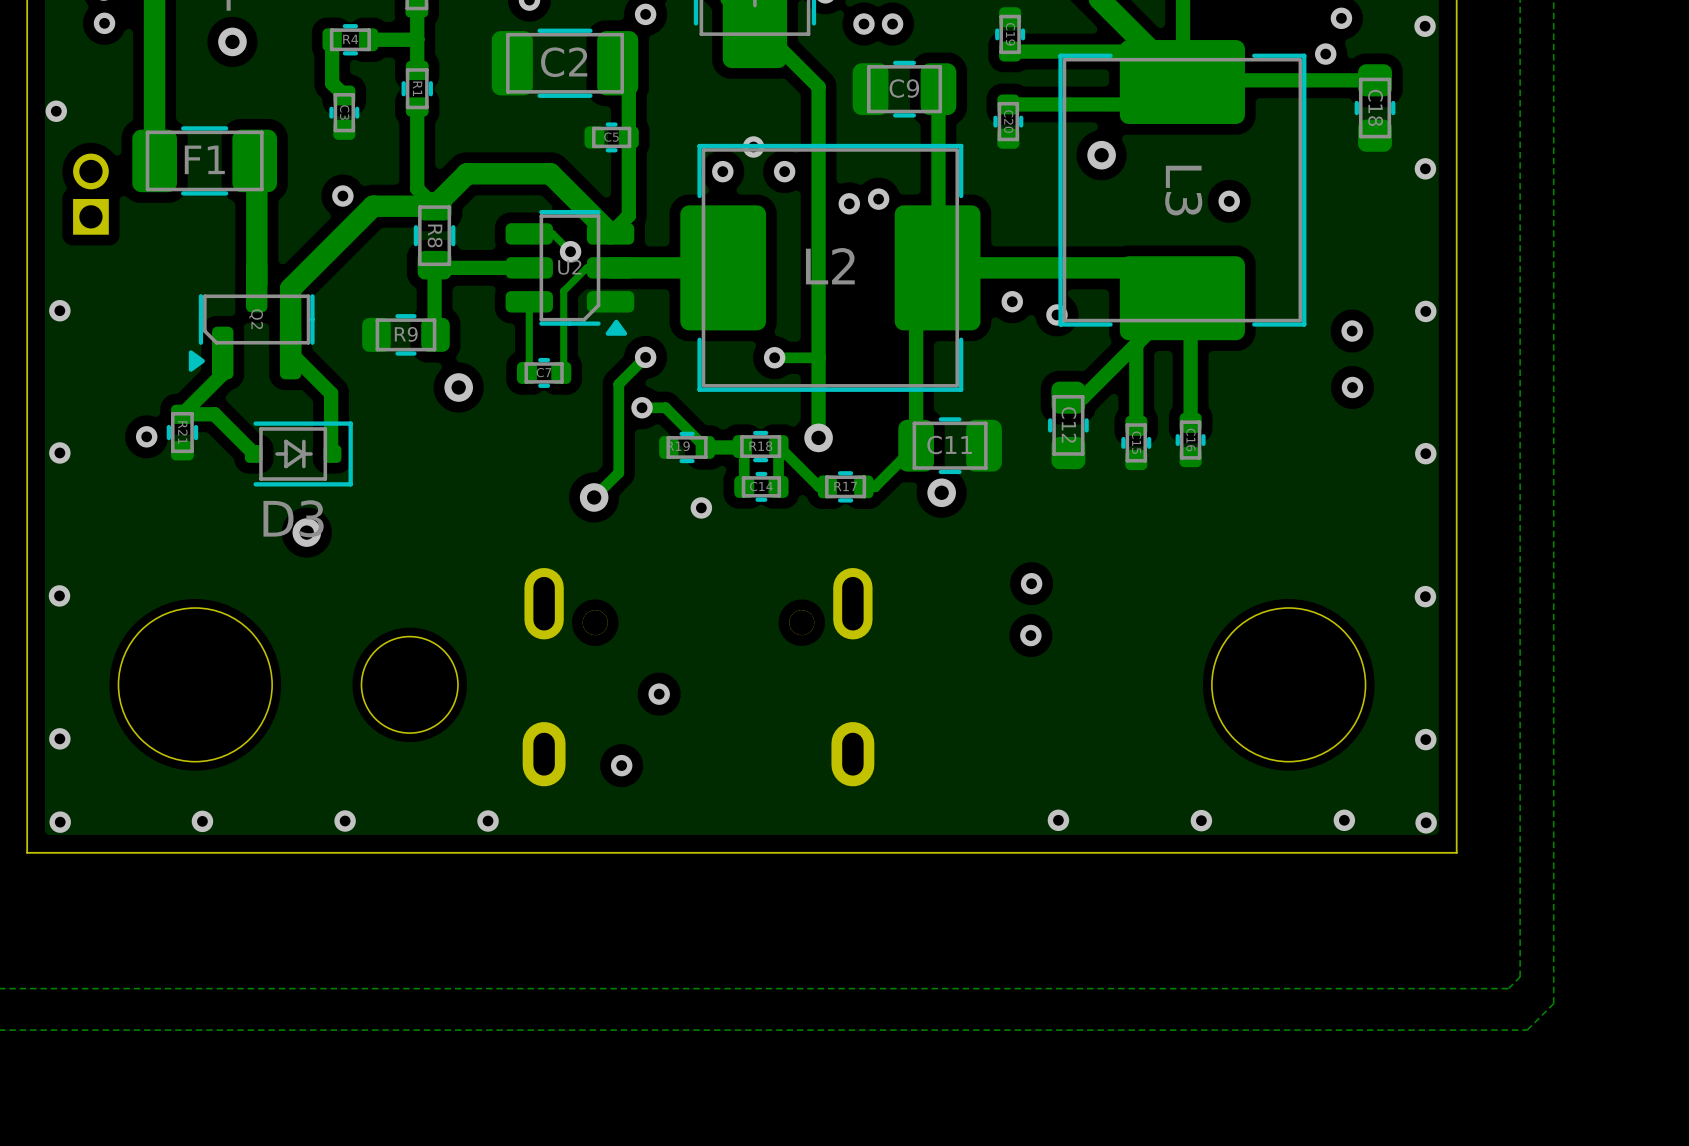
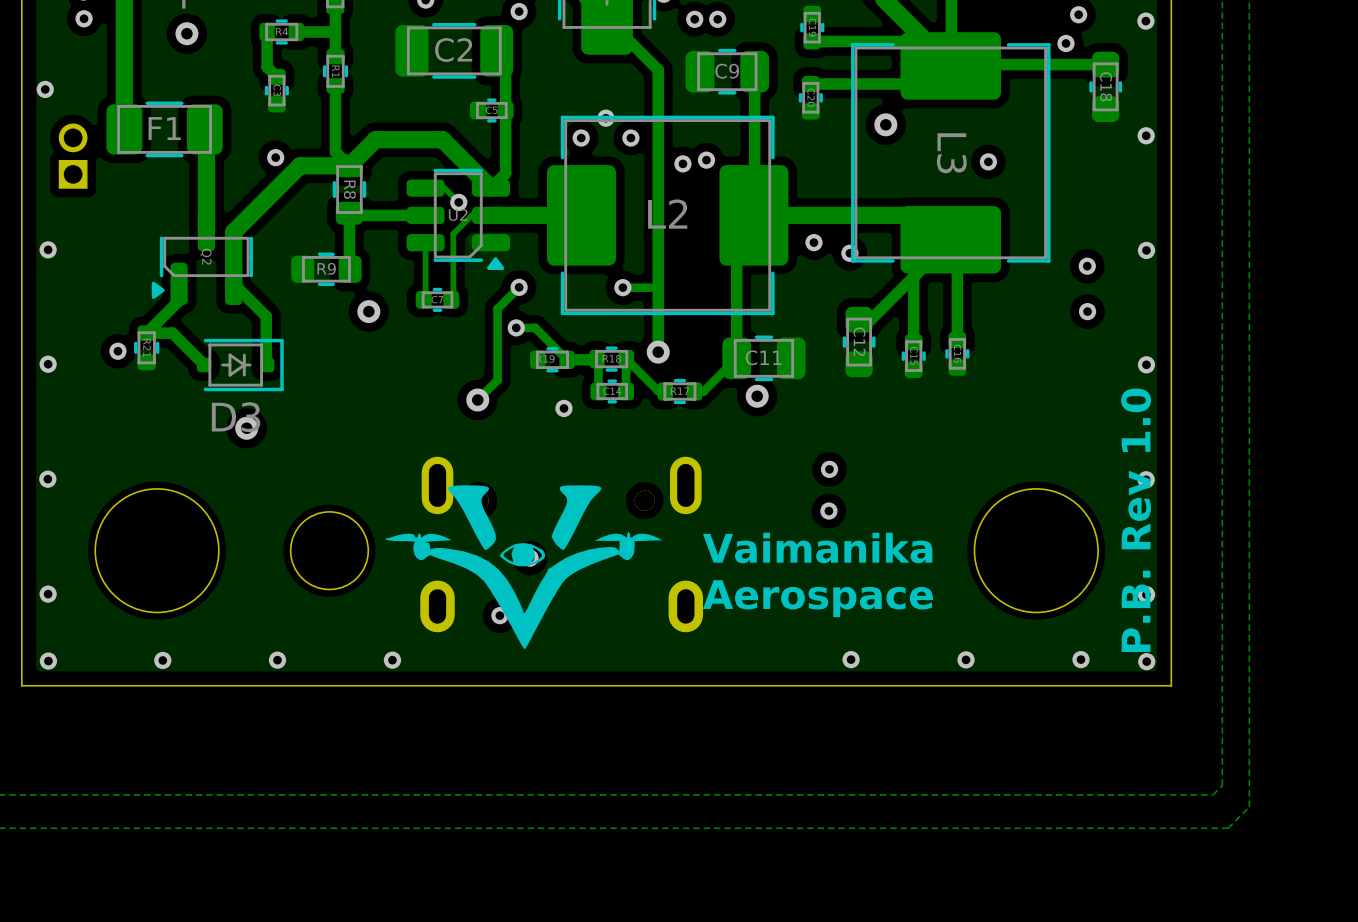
drawing: none -> [385, 485, 663, 650]
text: none -> P.B. Rev 1.0 (1136, 520)
text: none -> Vaimanika (817, 547)
text: none -> Aerospace (817, 598)

